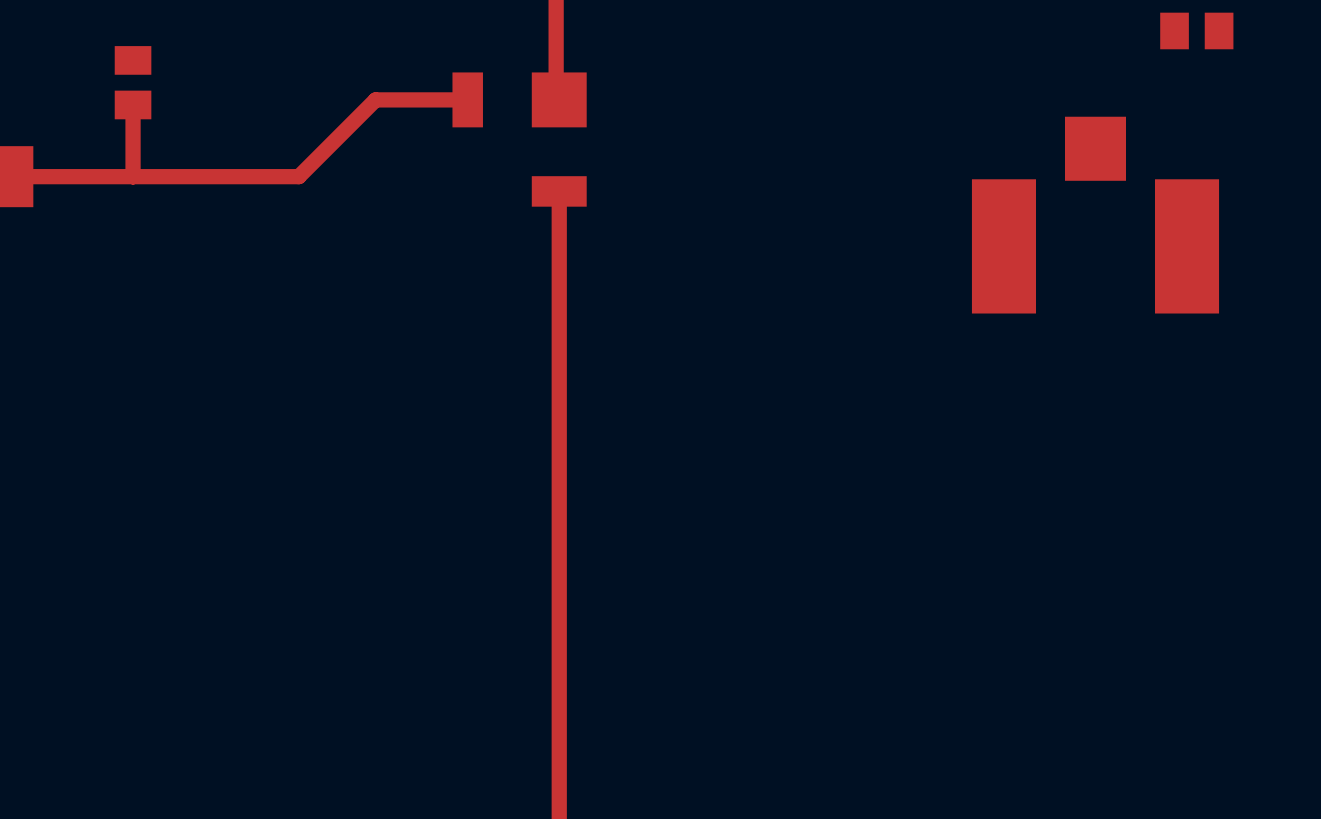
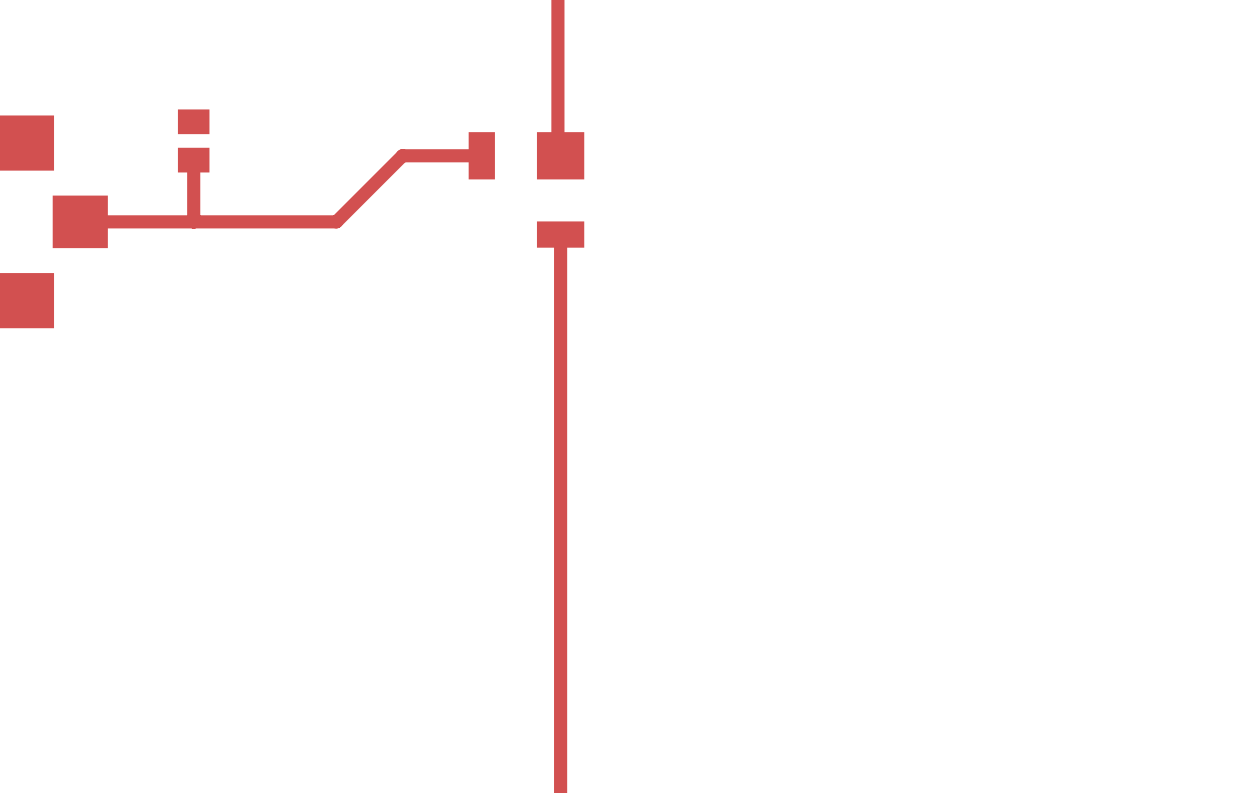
part: (1196, 30) -> none
part: (1095, 215) -> none

